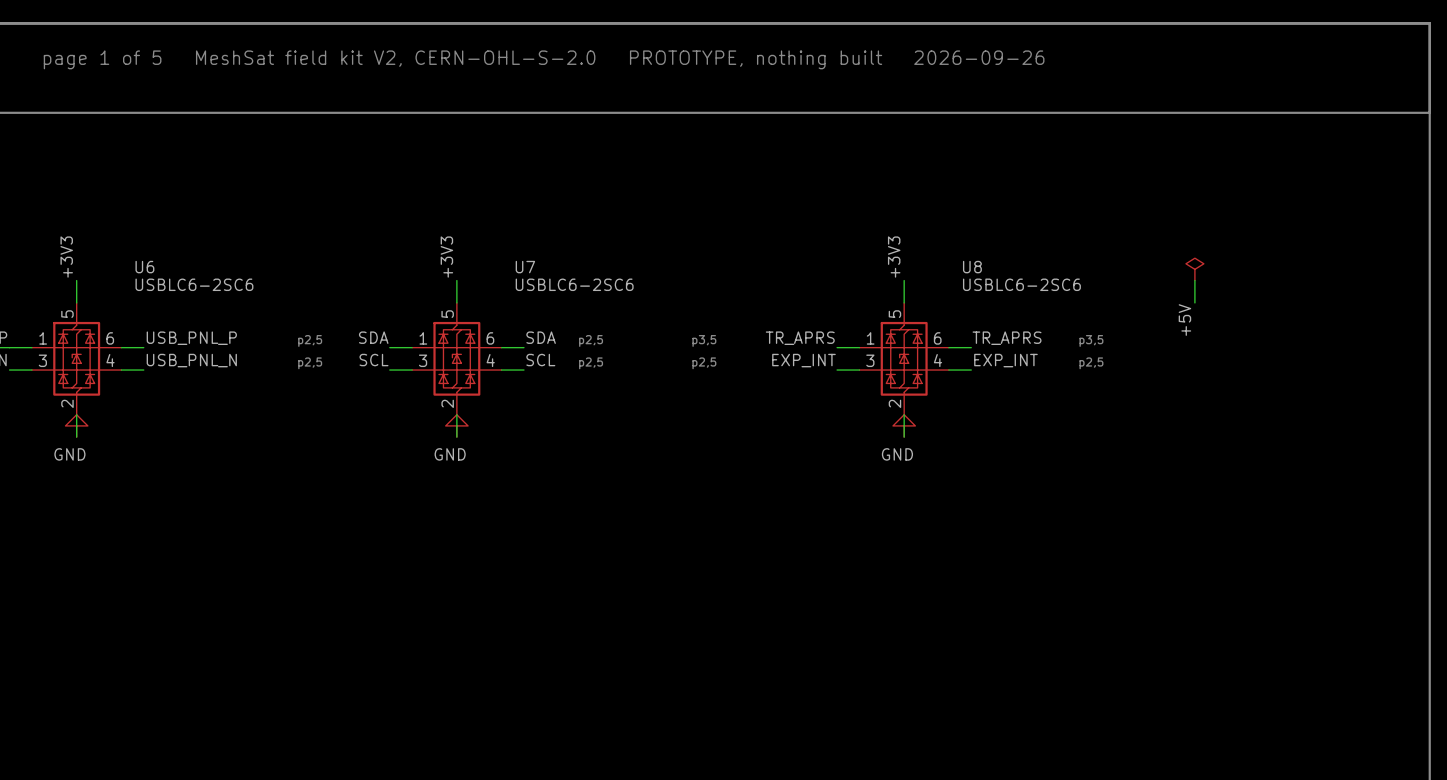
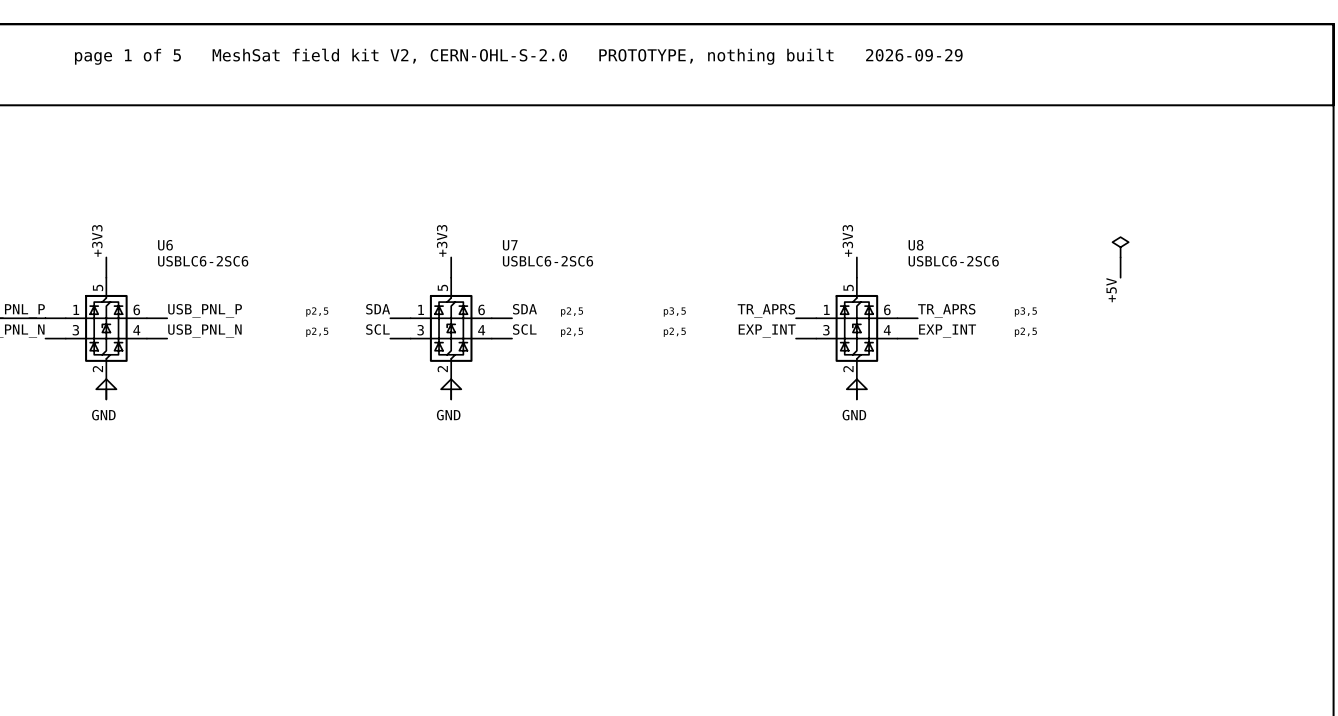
text: page 1 of 5 MeshSat field kit V2, CERN-OHL-S-2.0 PROTOTYPE, nothing built 2026-09-26 (544, 59) -> page 1 of 5 MeshSat field kit V2, CERN-OHL-S-2.0 PROTOTYPE, nothing built 2026-09-29 (518, 56)

